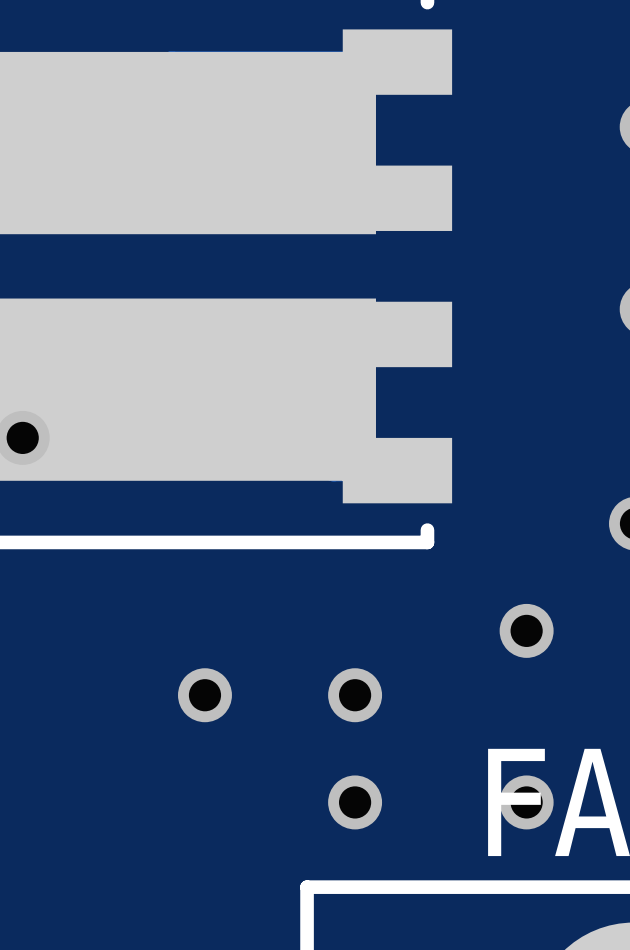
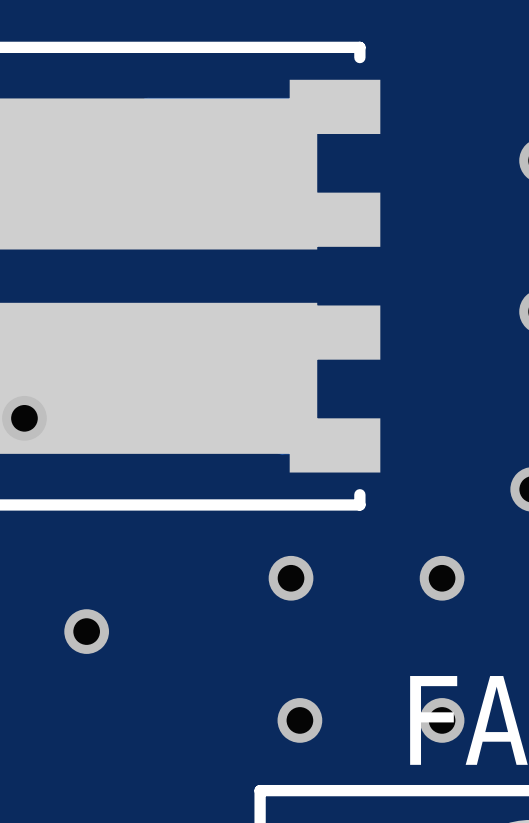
via: none -> (86, 631)
via: (204, 695) -> none
via position: (355, 695) -> (291, 578)

